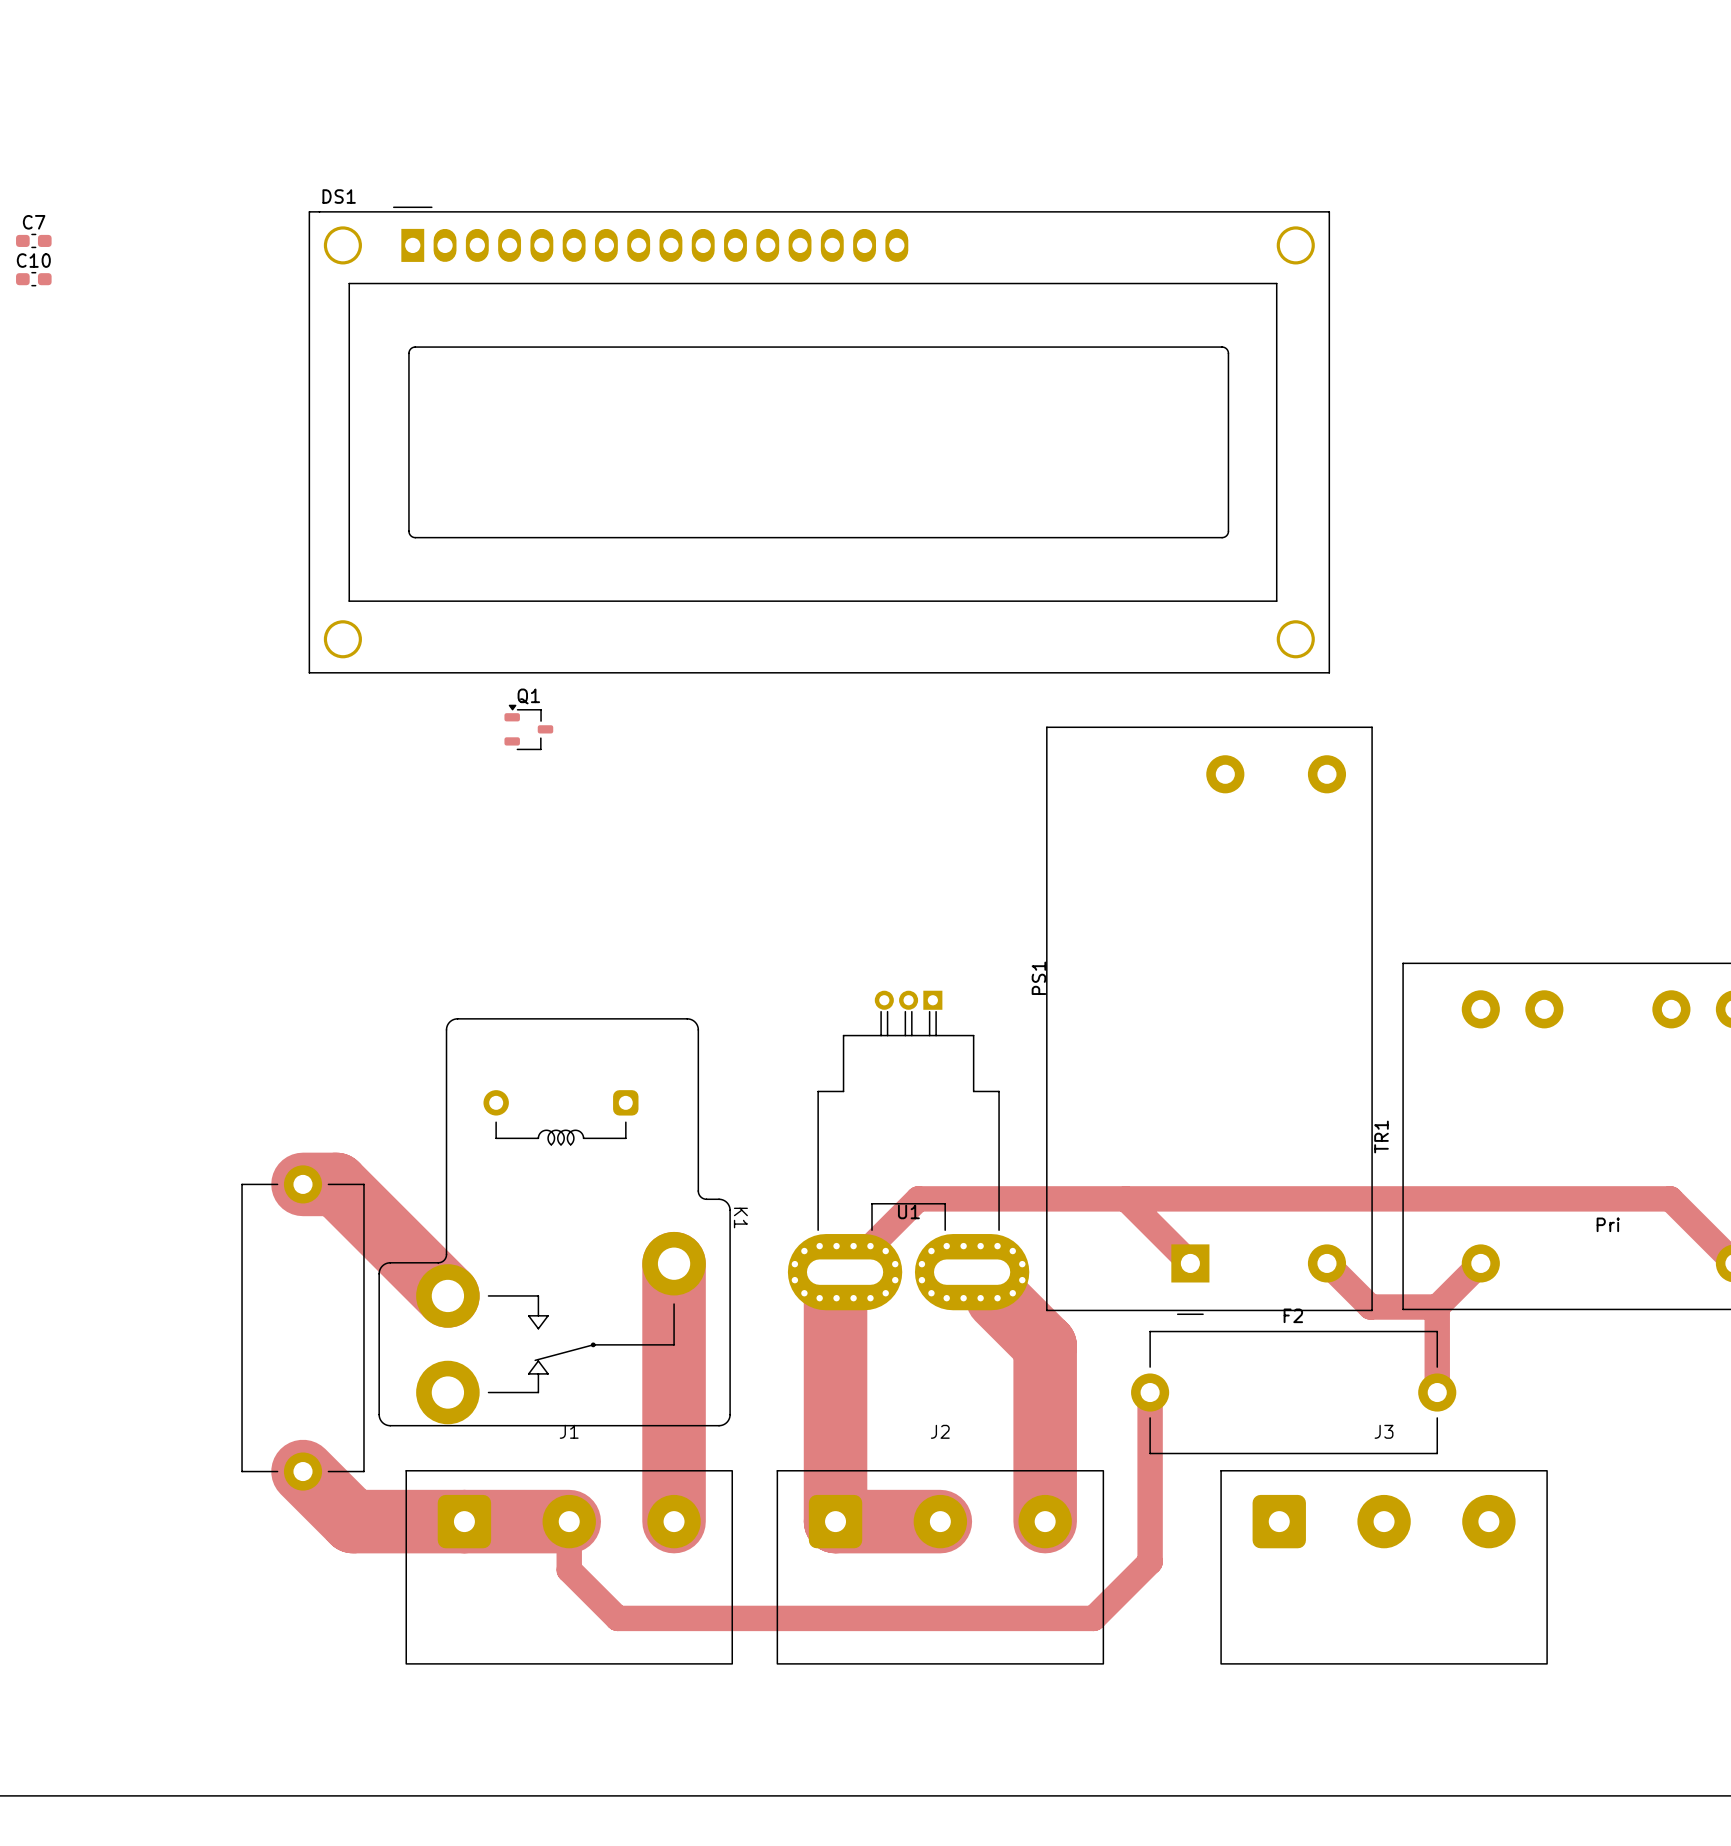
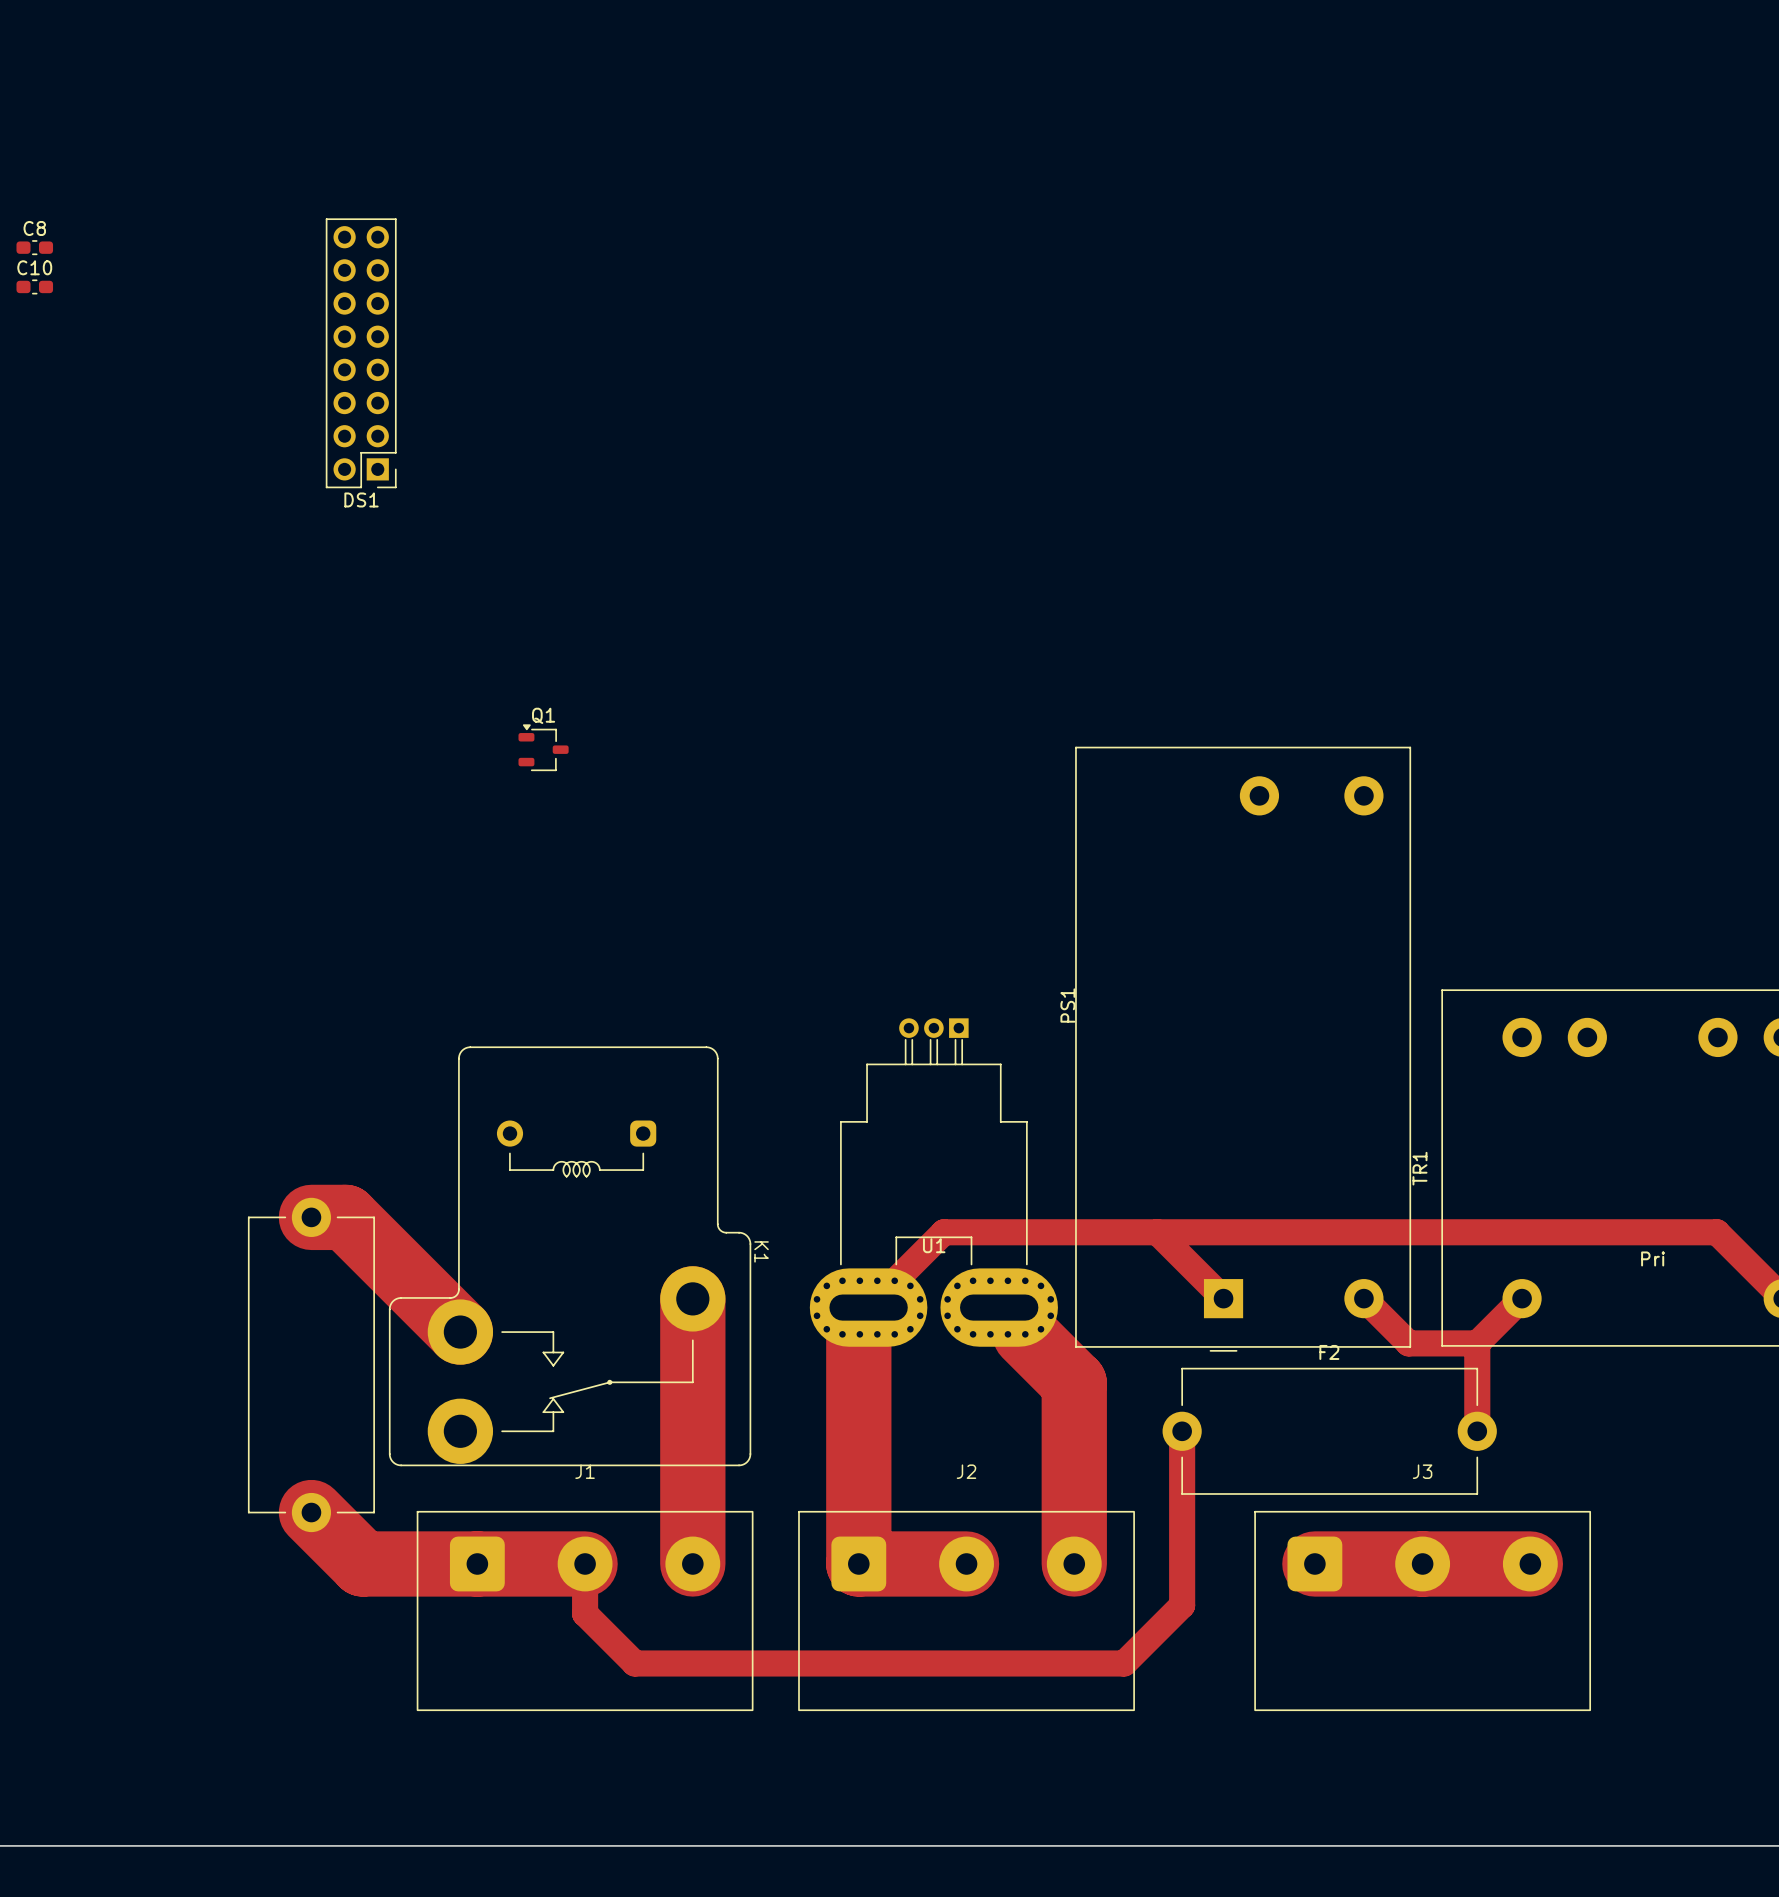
DS1 name position: DS1 (339, 196) -> DS1 (361, 499)
DS1 footprint: [308, 206, 1331, 674] -> [325, 218, 397, 489]
C7 name: C7 (34, 222) -> C8 (34, 228)
track: none -> (1314, 1563) (1530, 1563)

